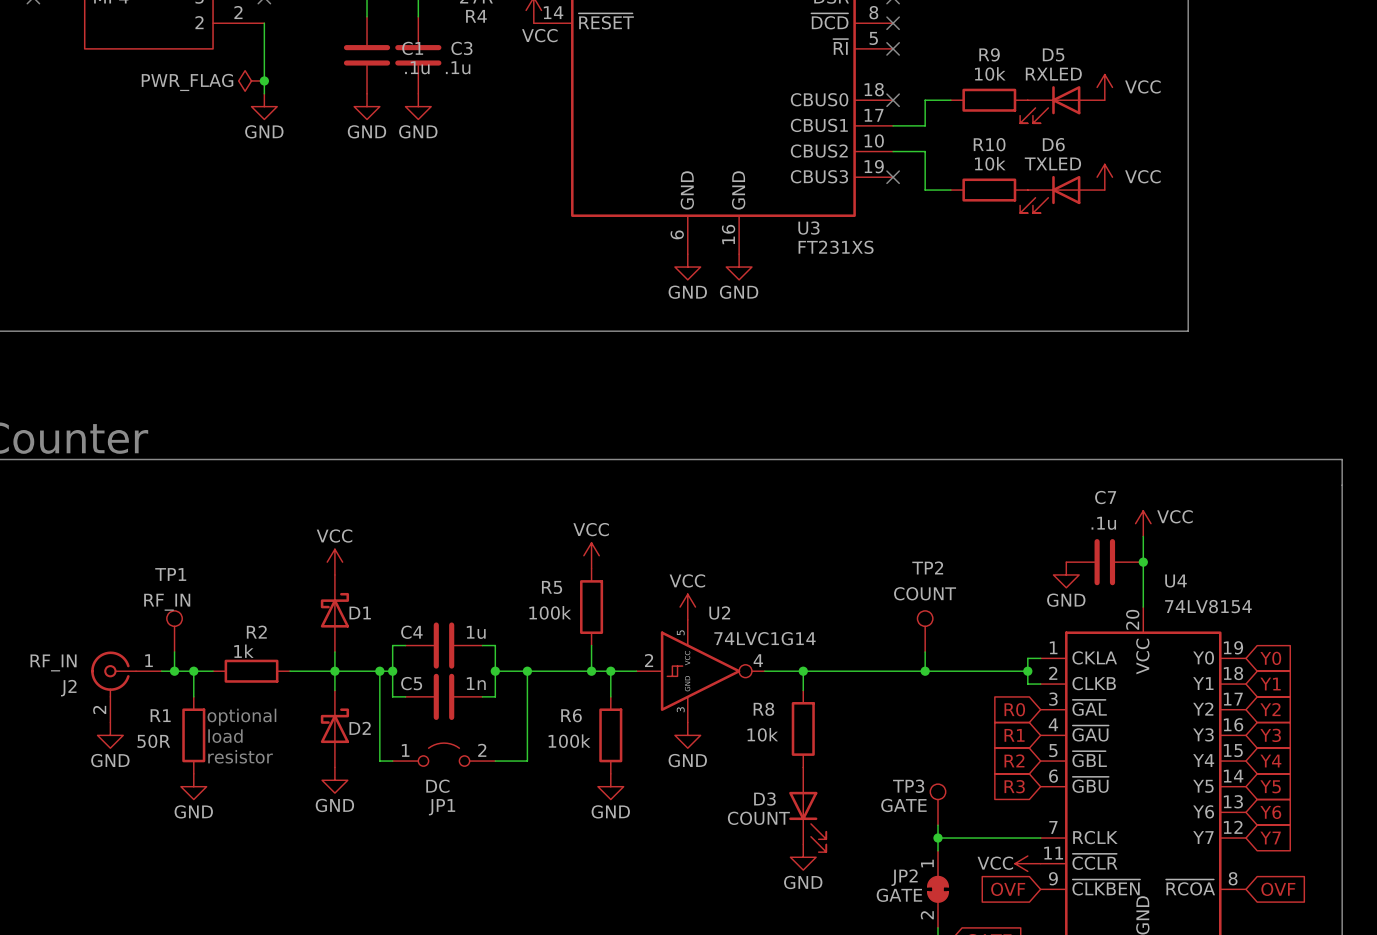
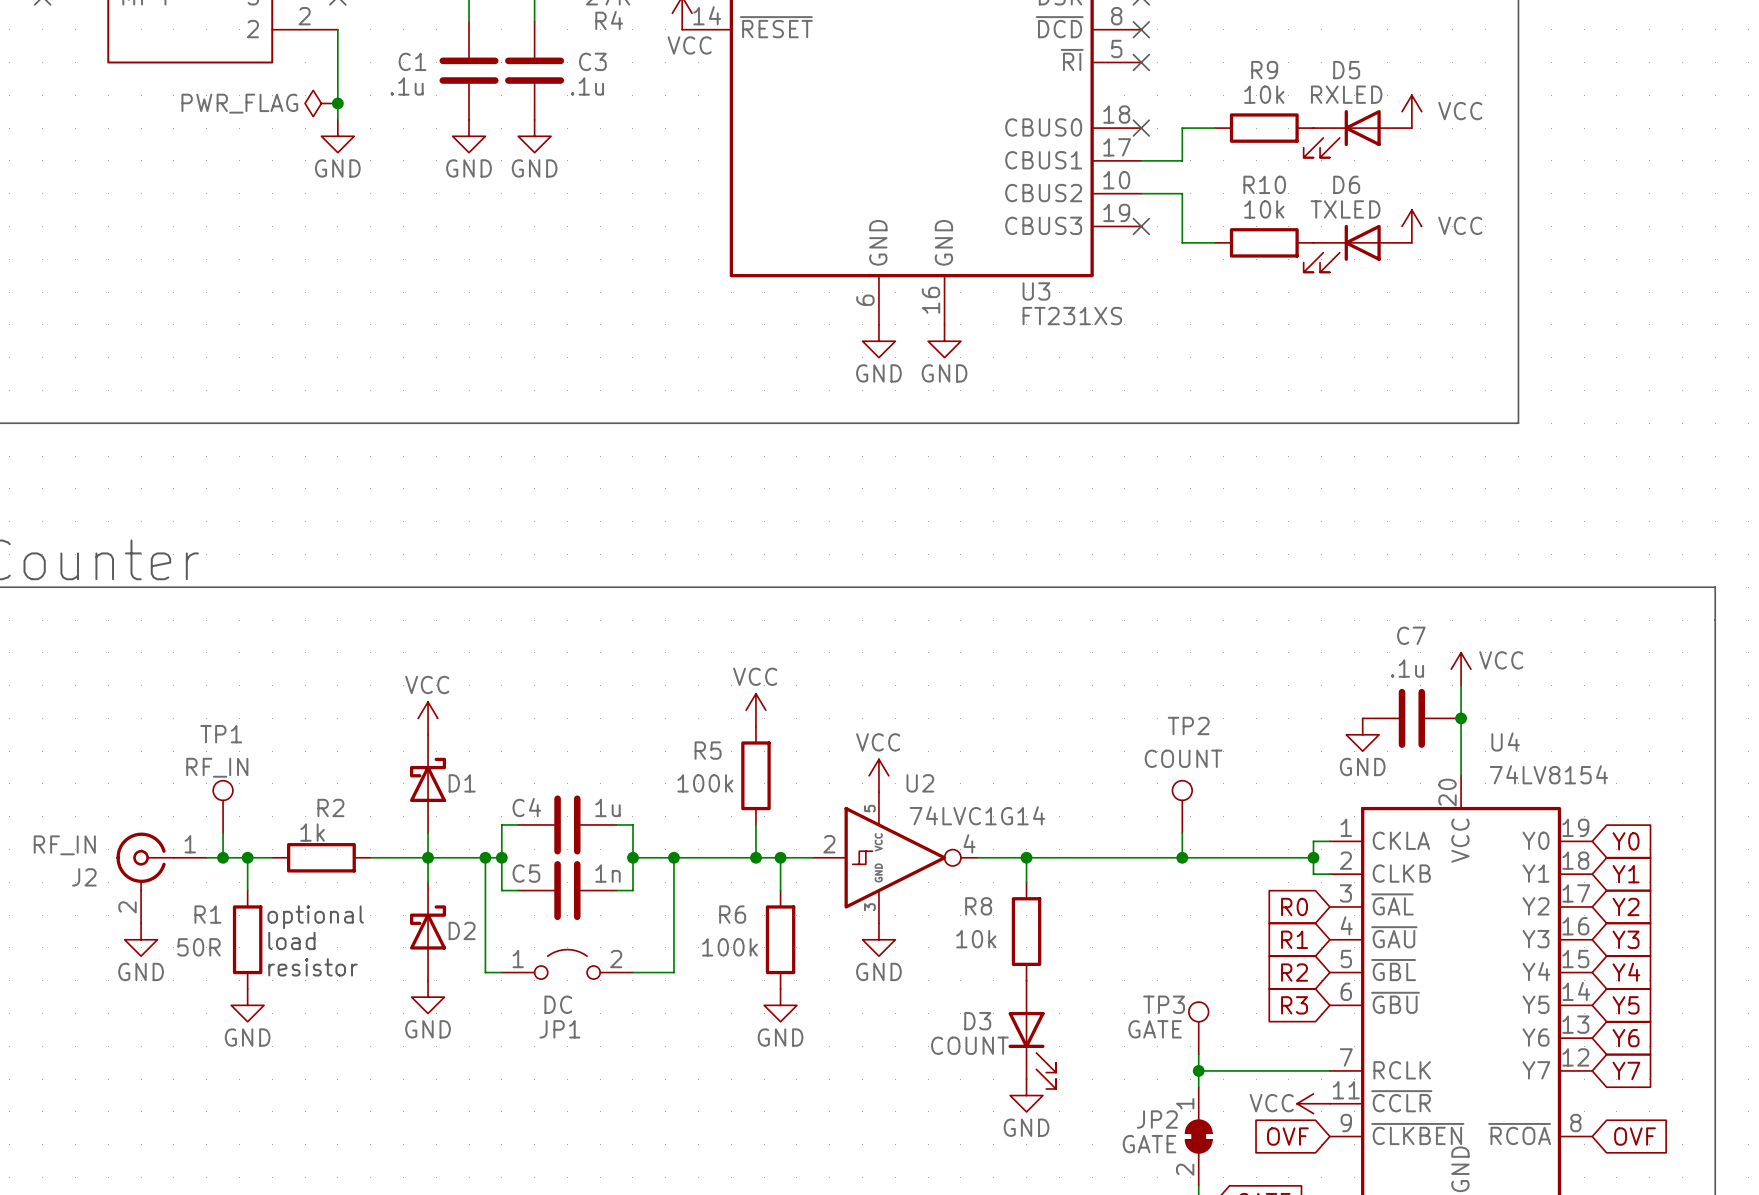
C1 name position: C1 (412, 48) -> C1 (412, 61)
C1 value position: .1u (417, 67) -> .1u (407, 86)

